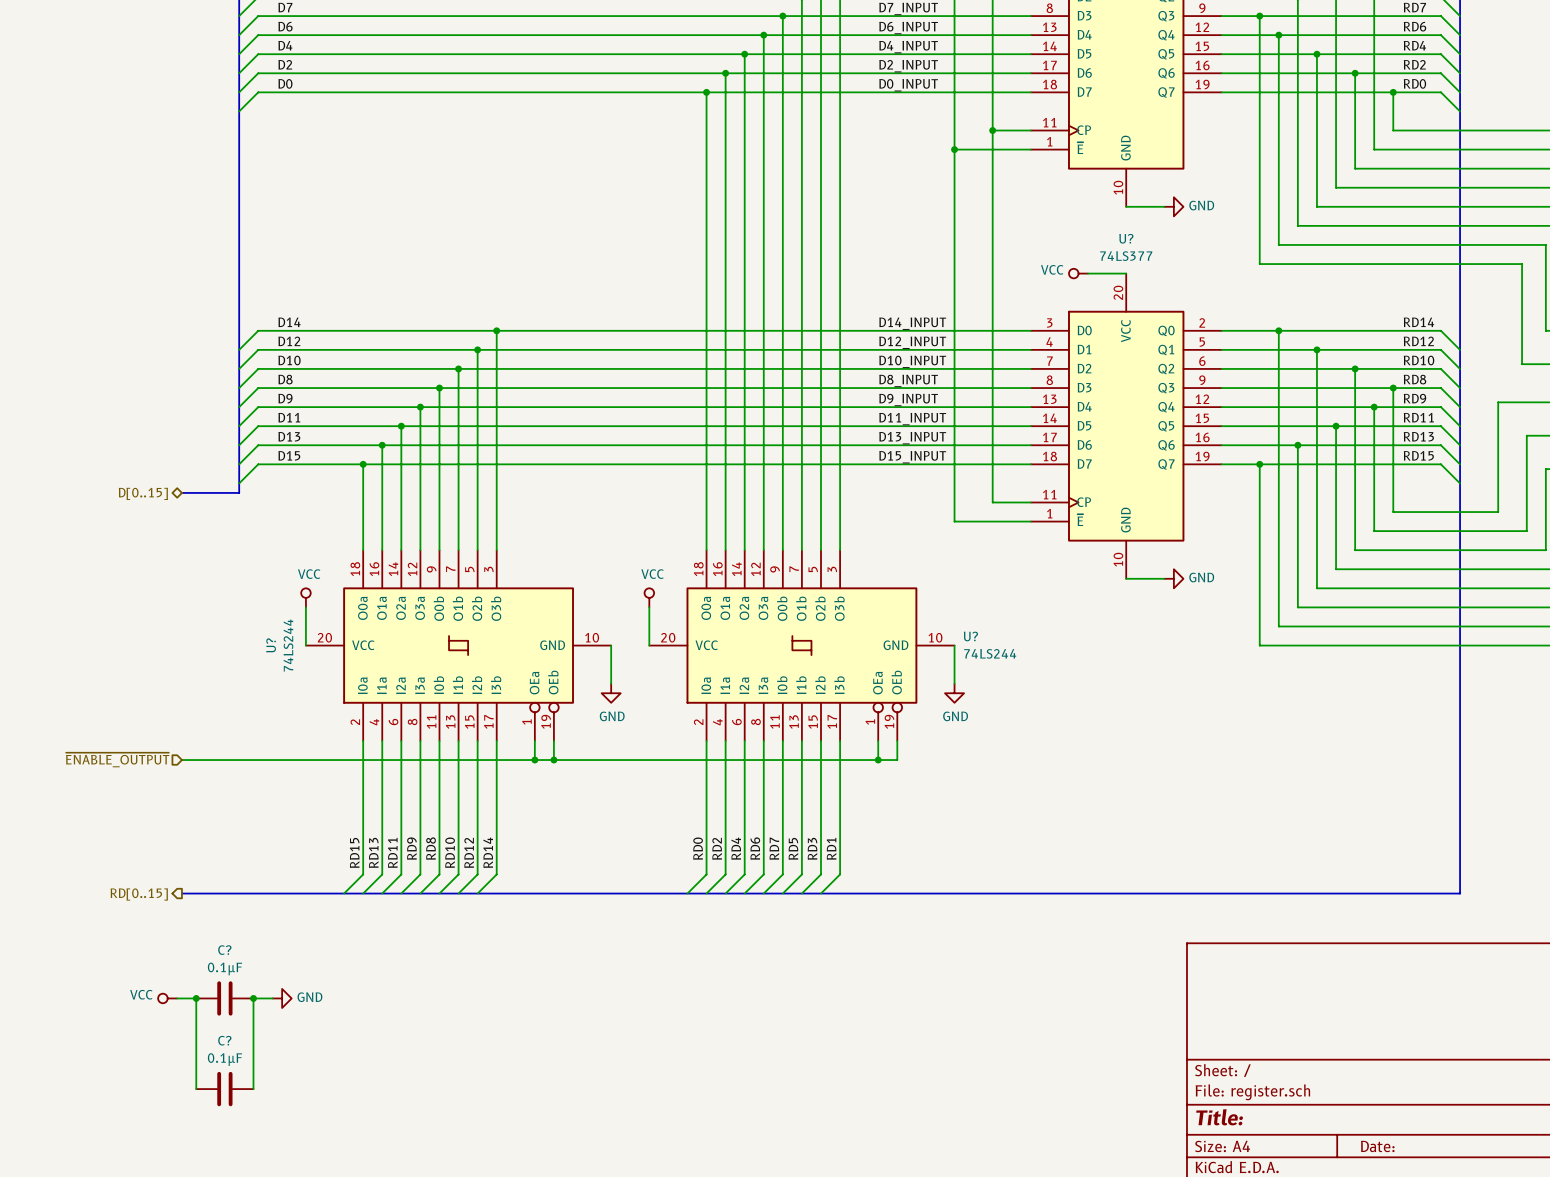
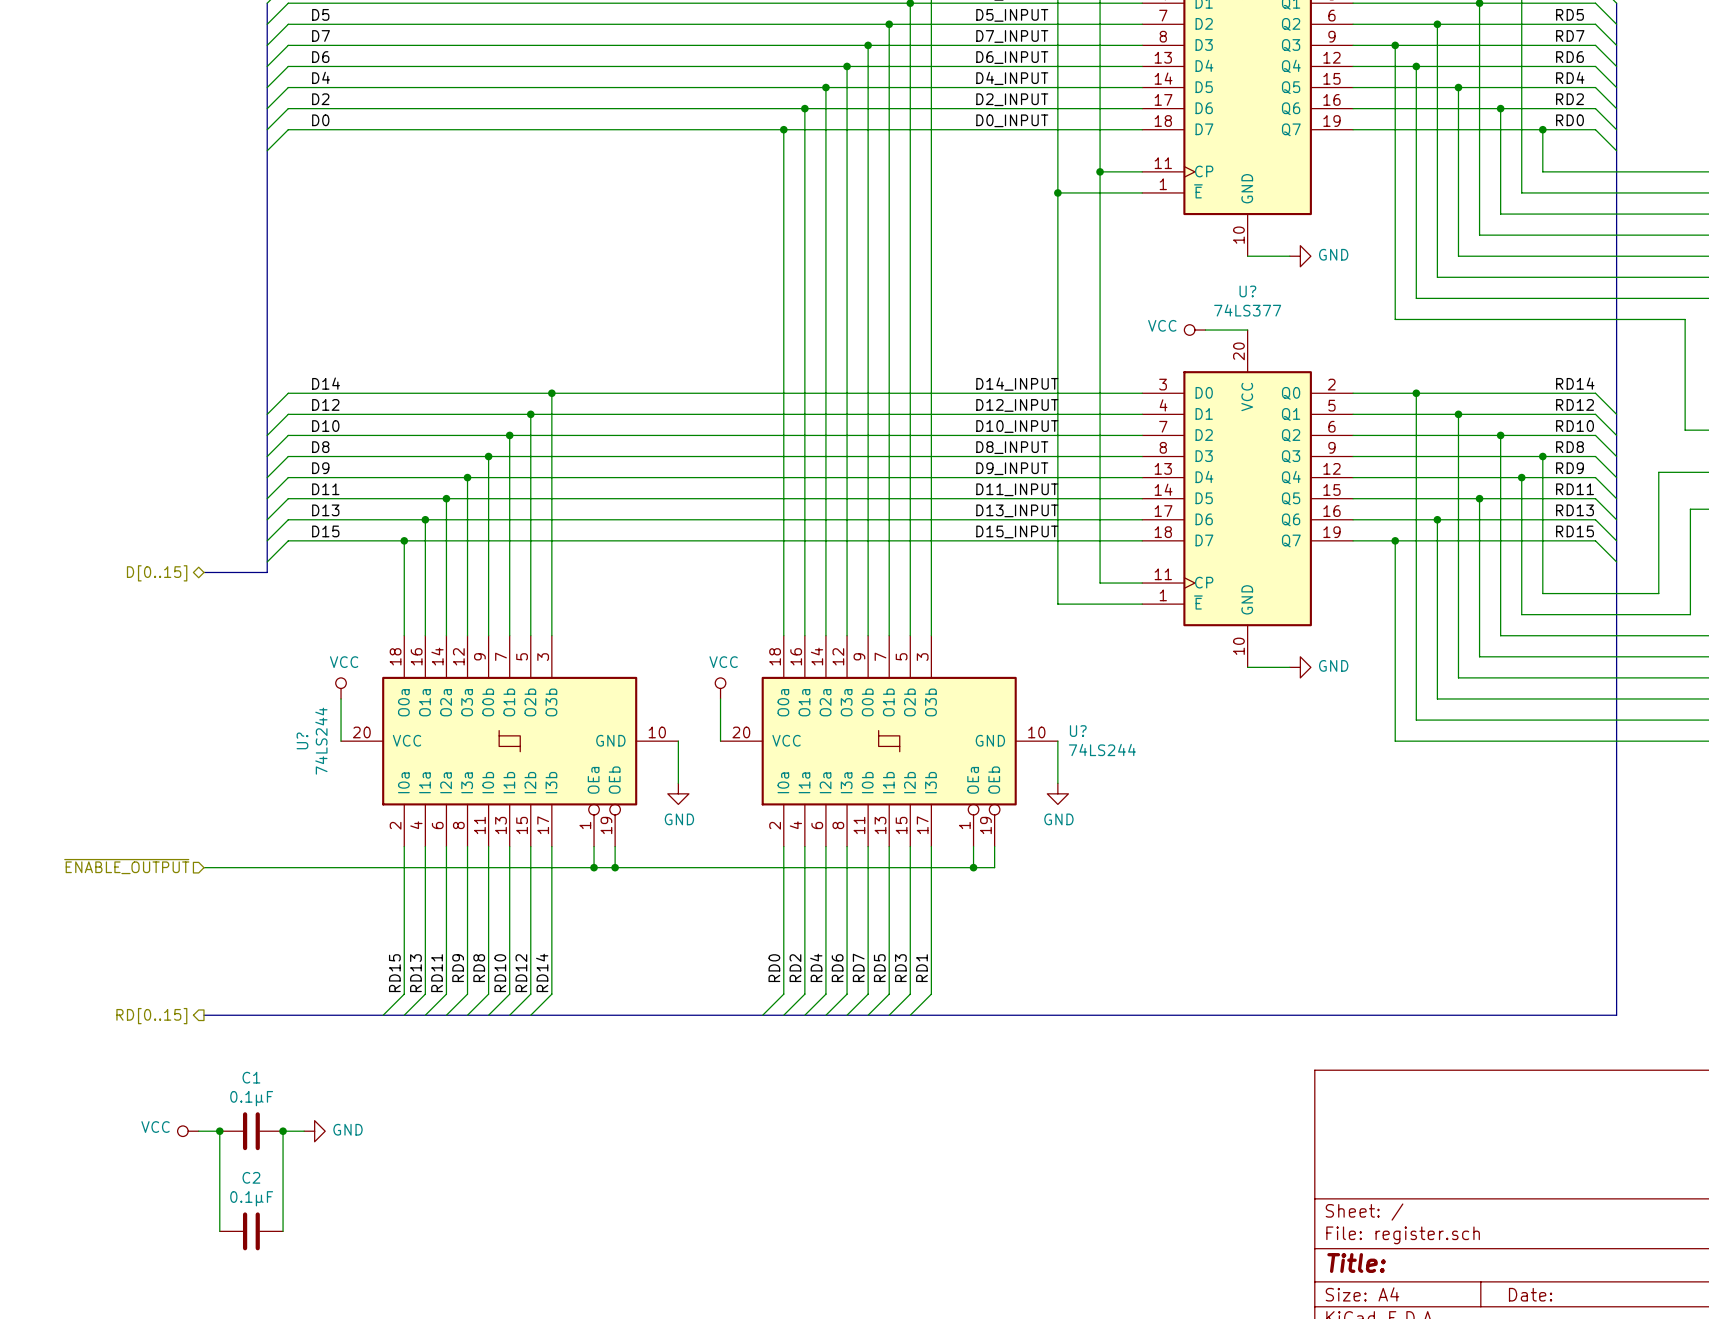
C? name: C? (224, 950) -> C1 (251, 1077)
C? name: C? (224, 1040) -> C2 (251, 1177)

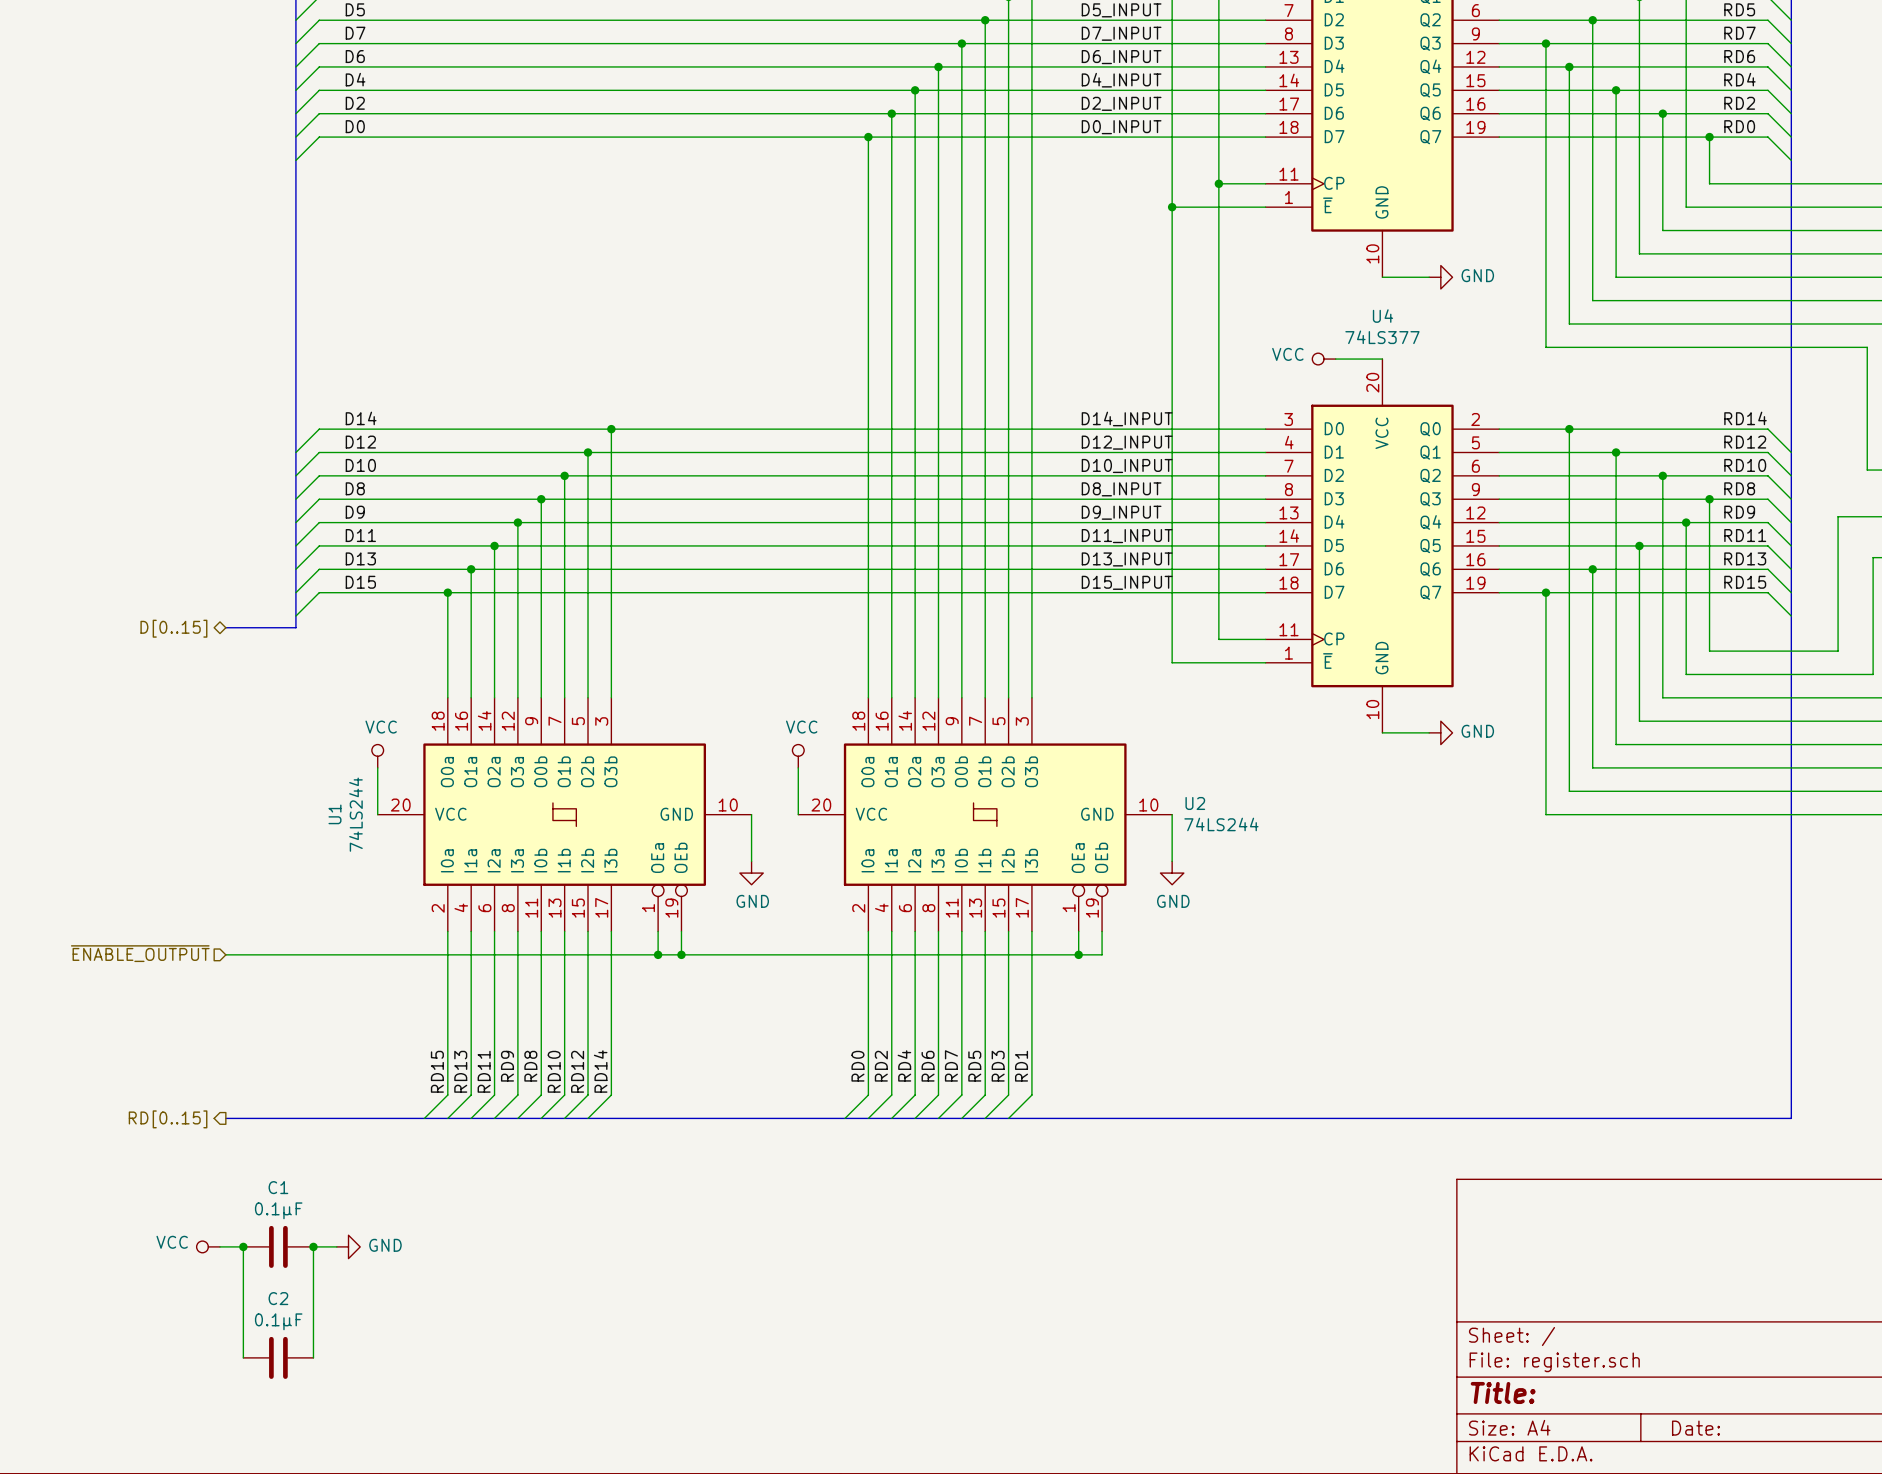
U? name: U? (1247, 291) -> U4 (1382, 316)
U? name: U? (1078, 731) -> U2 (1195, 803)
U? name: U? (302, 740) -> U1 (334, 814)

